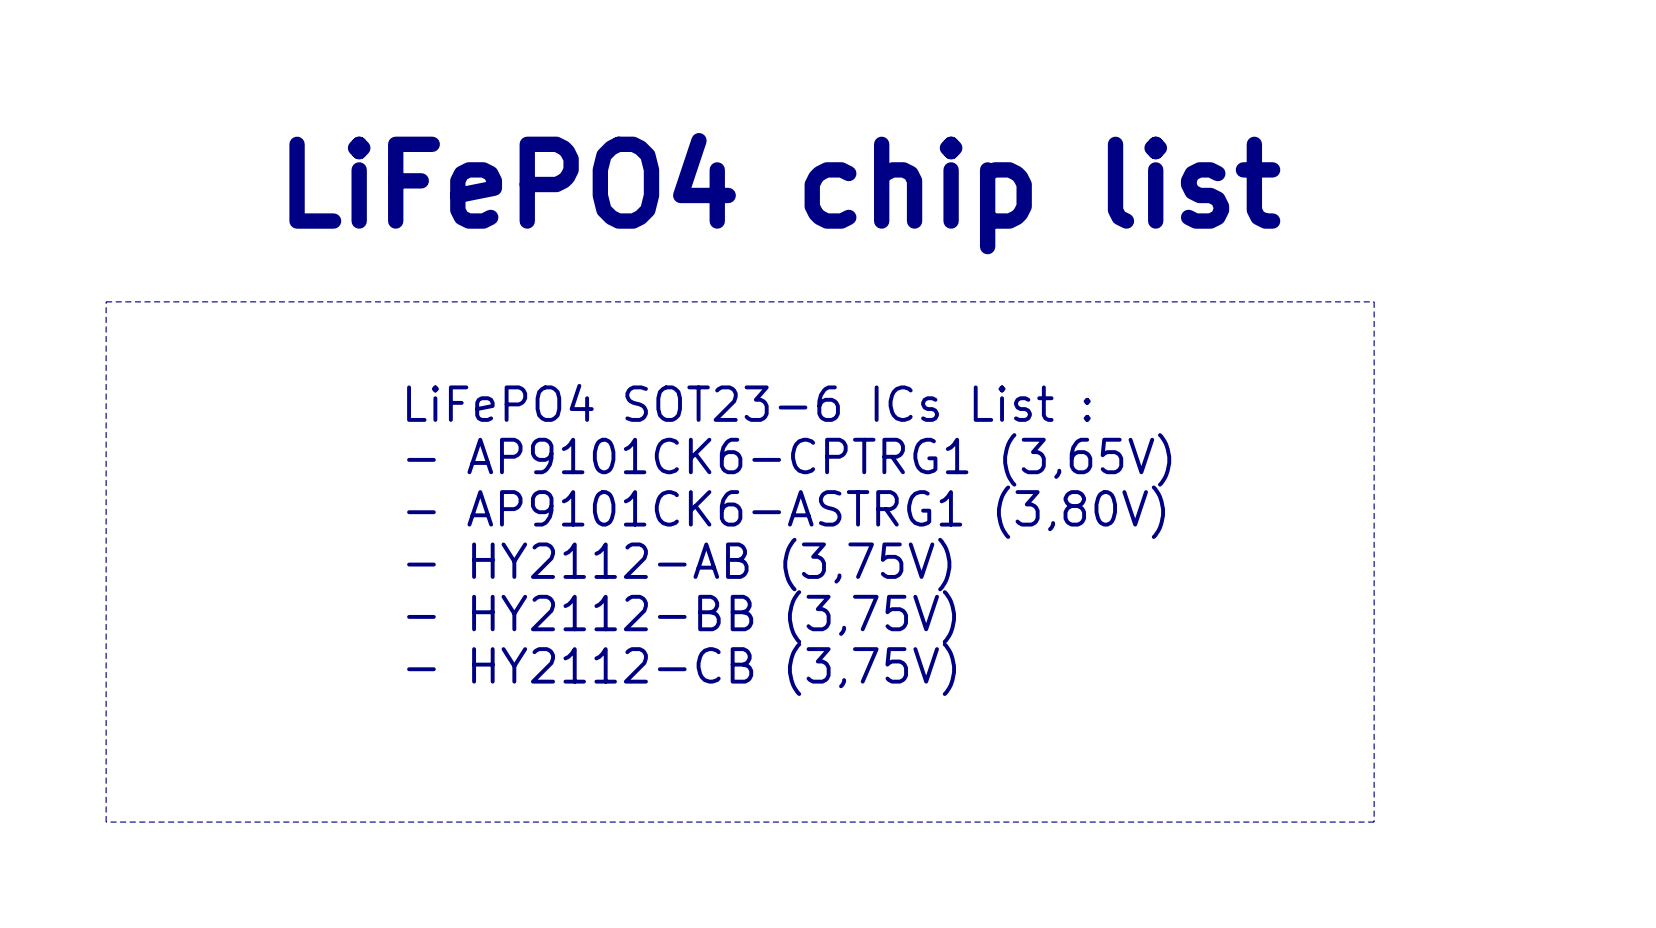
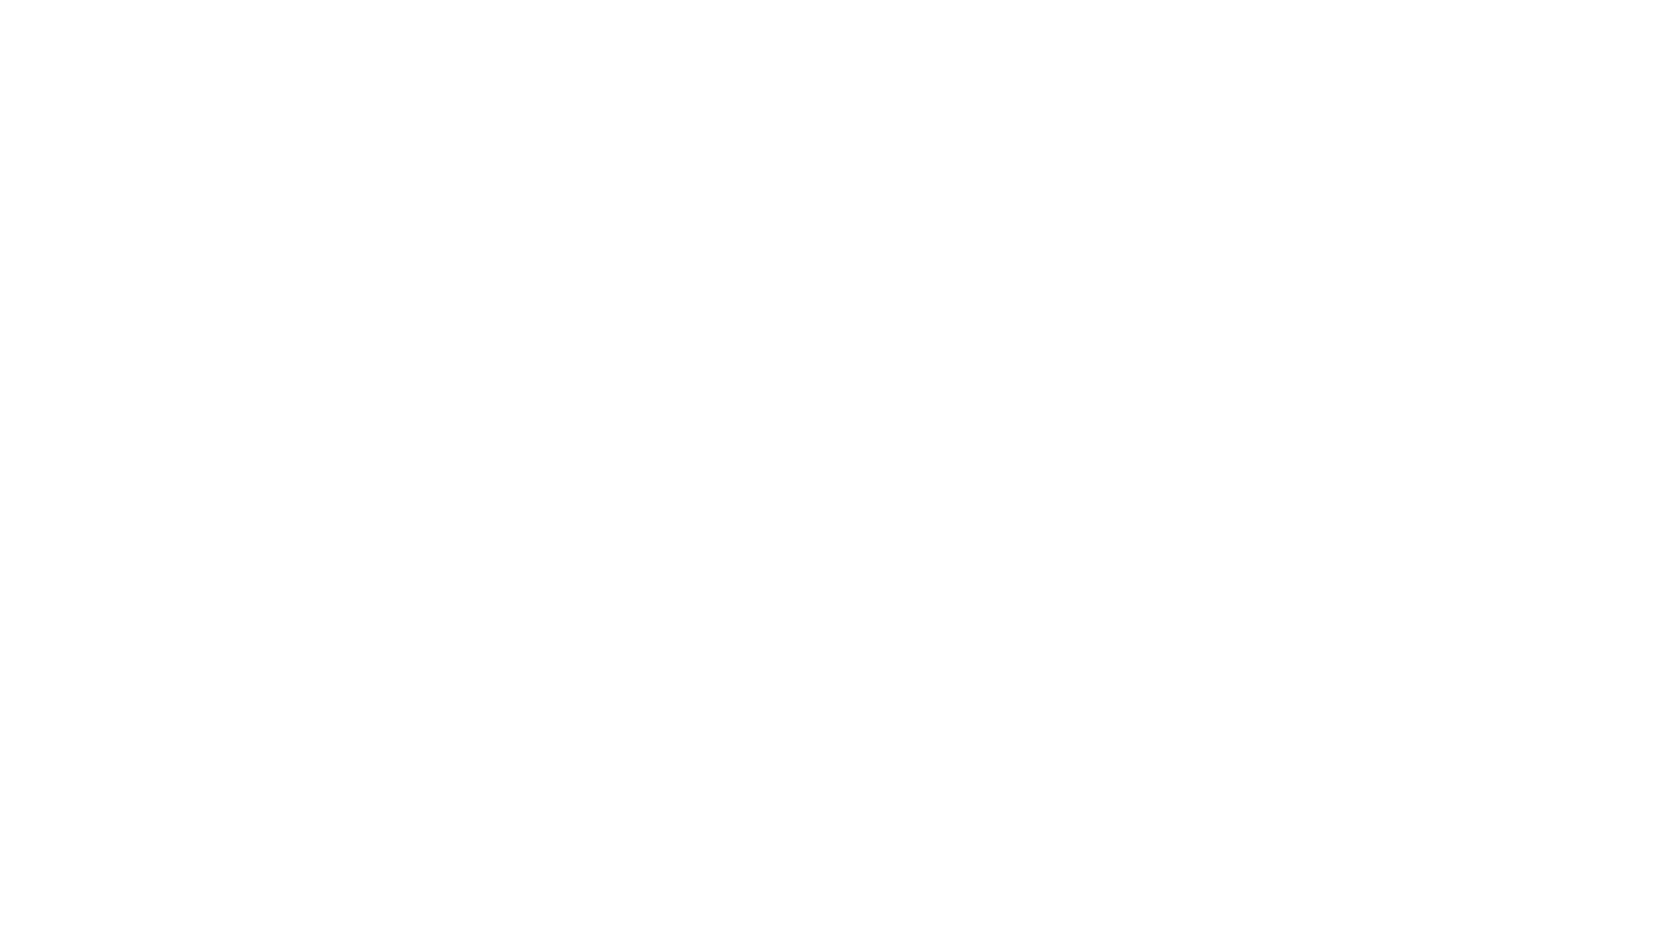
text: LiFePO4 chip list (784, 193) -> none
line: (106, 301) (1374, 301) (1374, 822) (106, 822) (106, 301) -> none
text: LiFePO4 SOT23-6 ICs List : (748, 402) -> none
text: - AP9101CK6-CPTRG1 (3,65V) (789, 459) -> none
text: - AP9101CK6-ASTRG1 (3,80V) (786, 512) -> none
text: - HY2112-AB (3,75V) (679, 564) -> none
text: - HY2112-BB (3,75V) (681, 616) -> none
text: - HY2112-CB (3,75V) (681, 669) -> none

